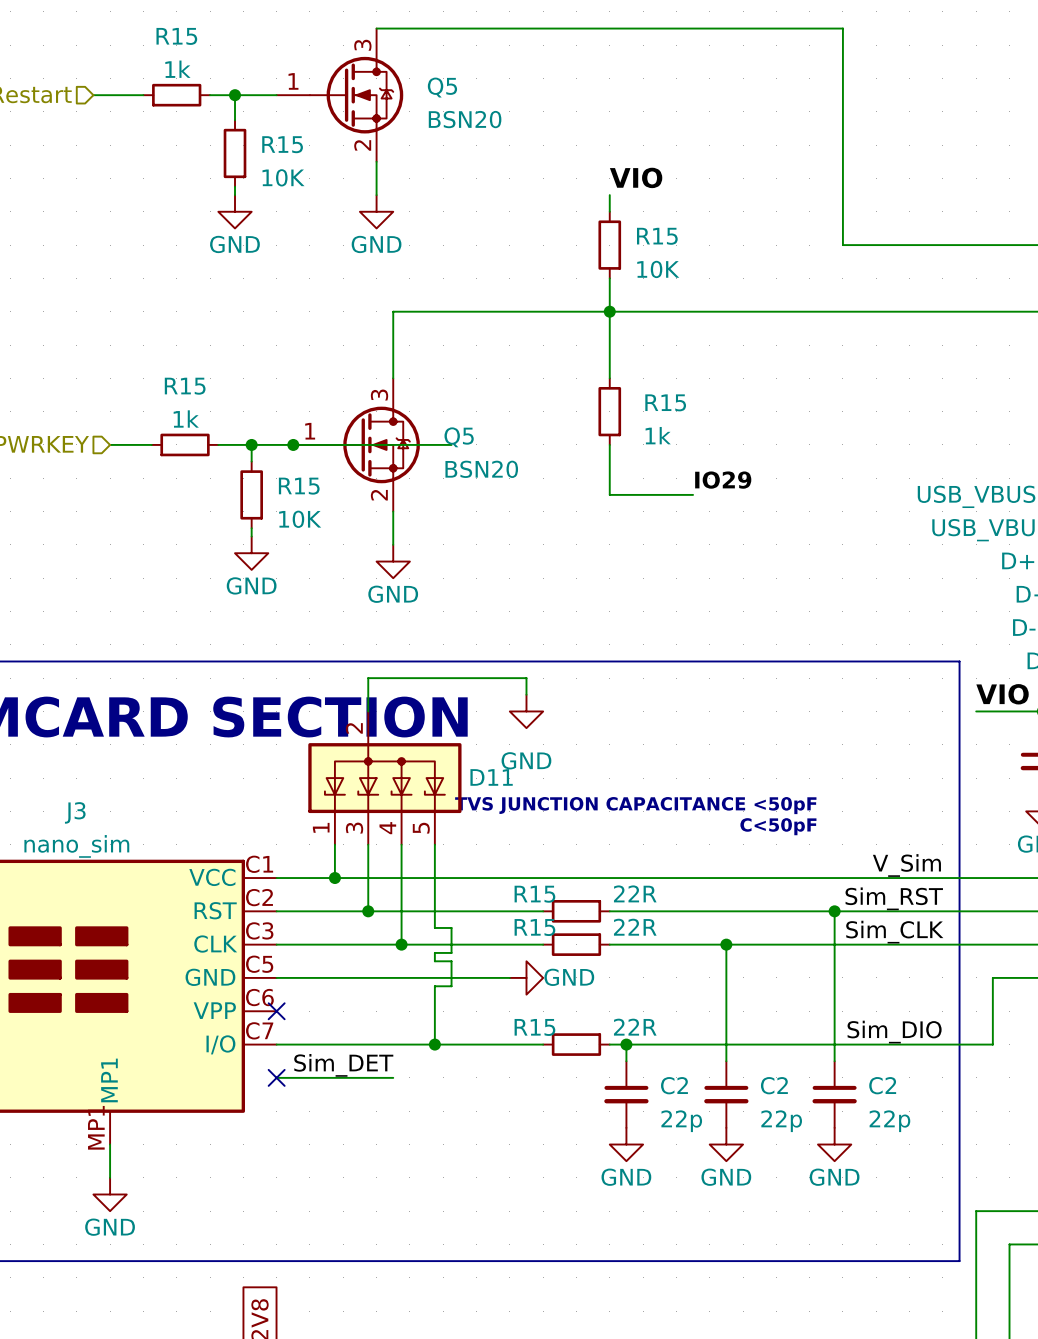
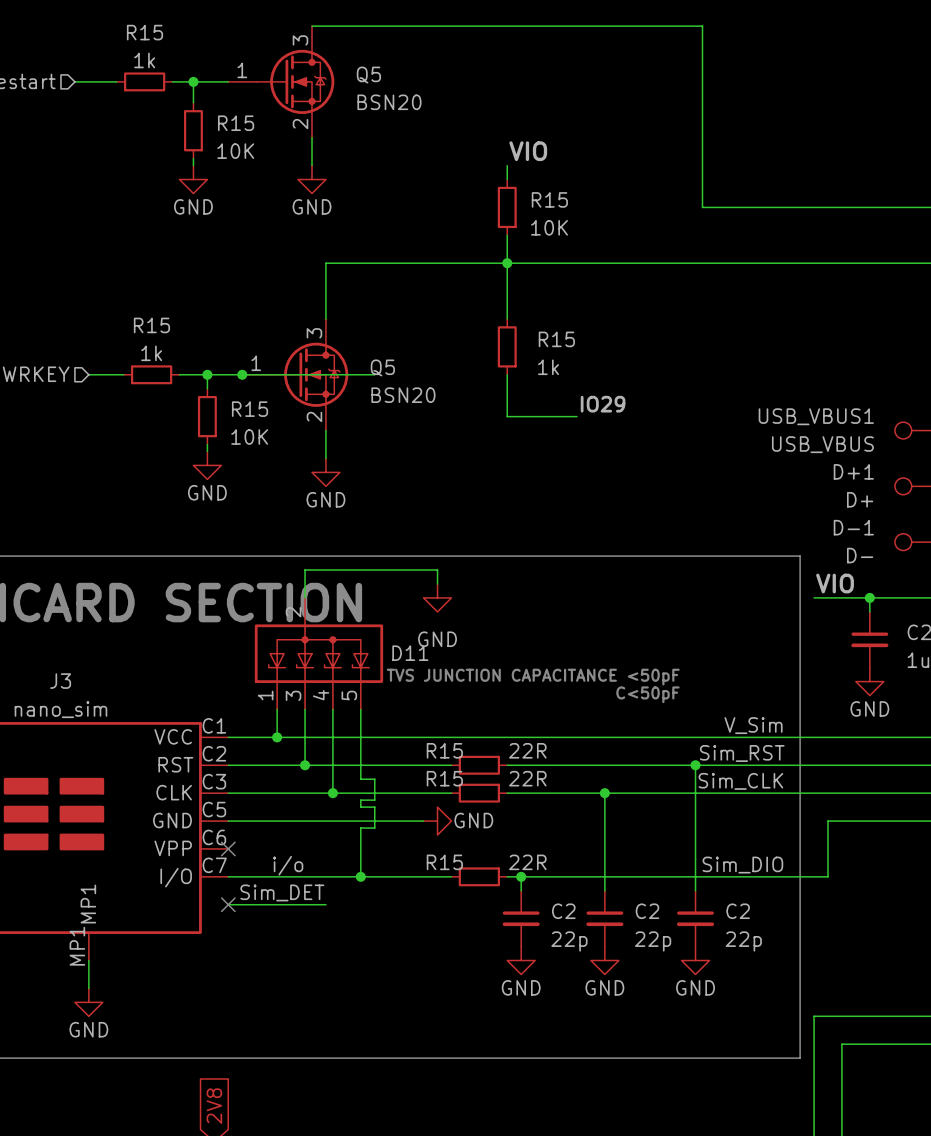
label: none -> i/o (288, 865)

